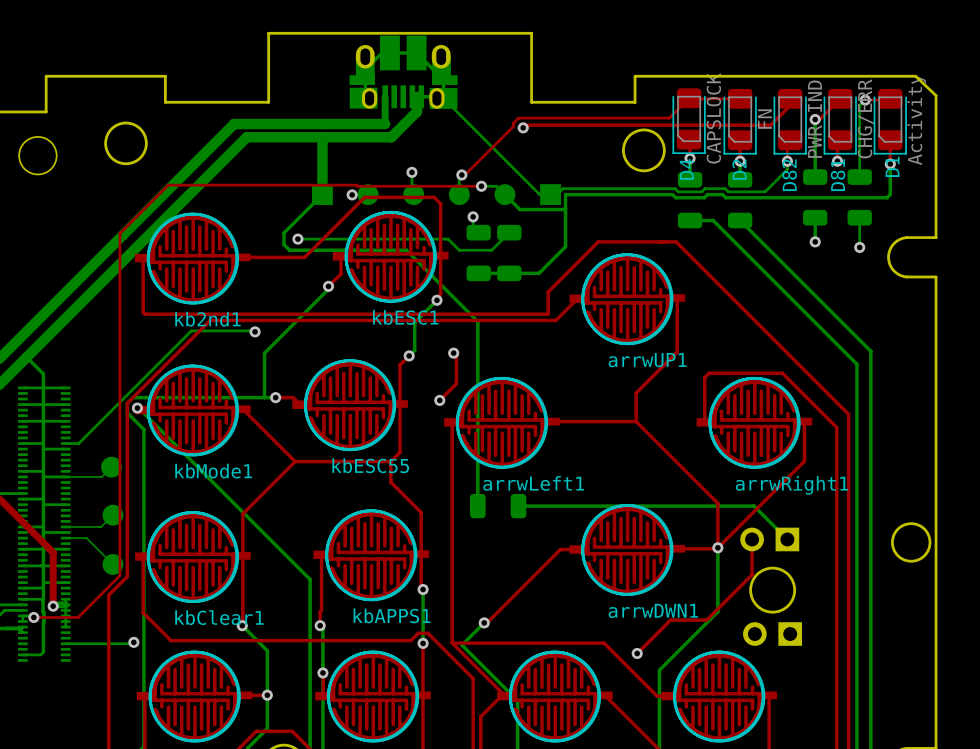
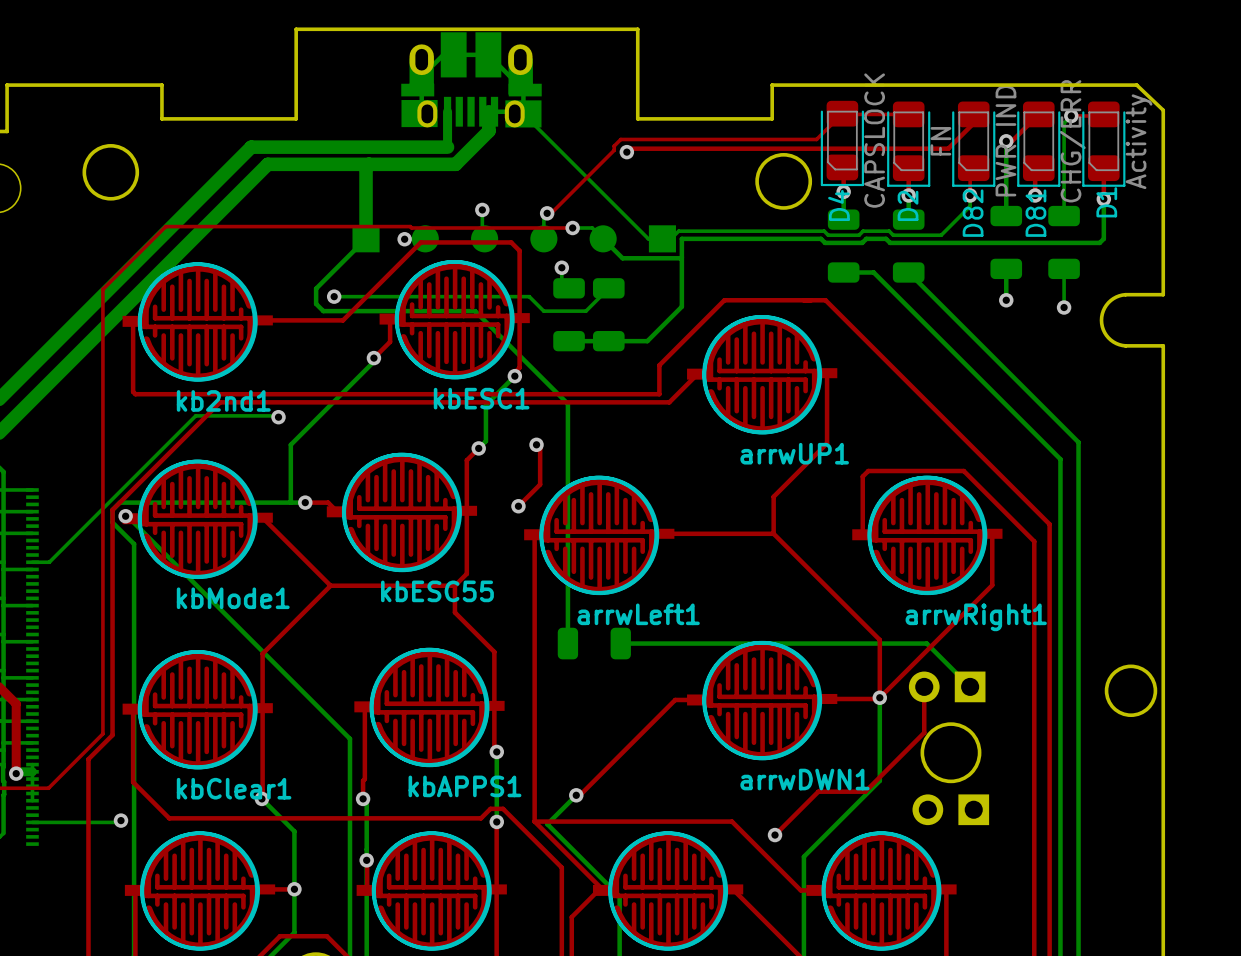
bottom track: (111, 467) (101, 476) (65, 476) -> none
part: (111, 467) -> none
part: (112, 515) -> none
bottom track: (112, 524) (112, 515) (101, 526) (65, 526) -> none
bottom track: (65, 538) (86, 538) (112, 564) -> none
part: (112, 564) -> none

